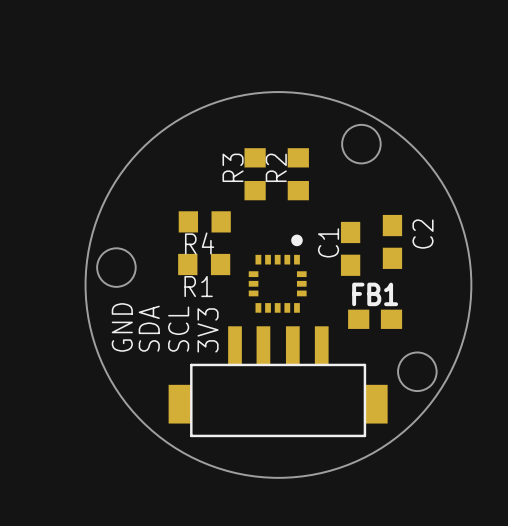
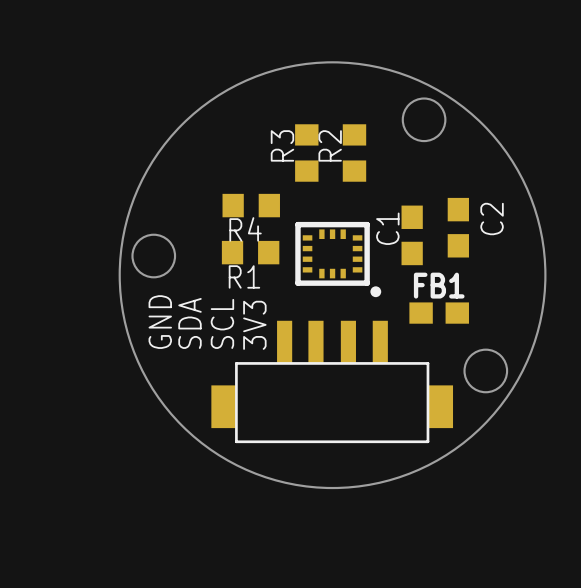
part footprint: [248, 234, 307, 313] -> [295, 221, 382, 298]

